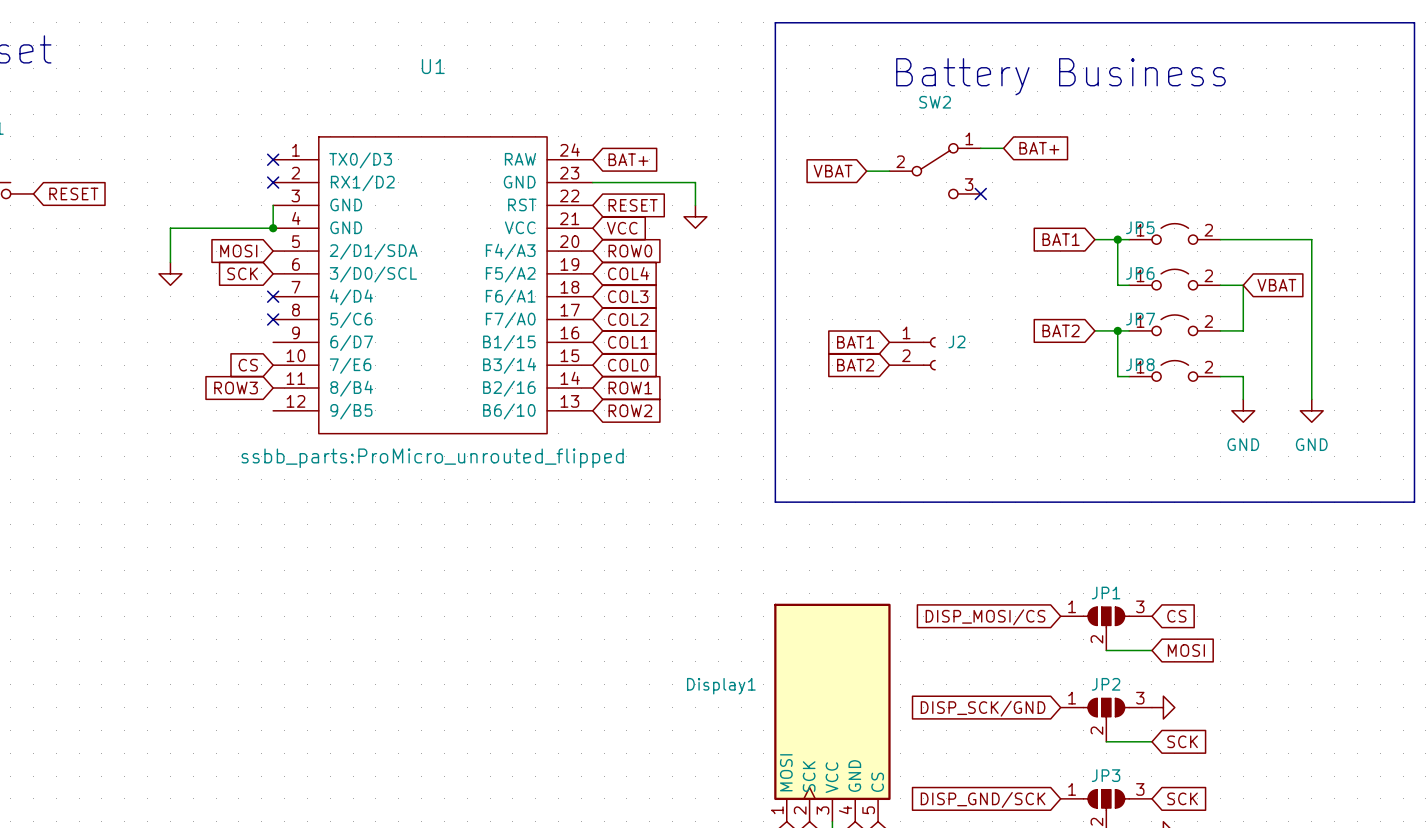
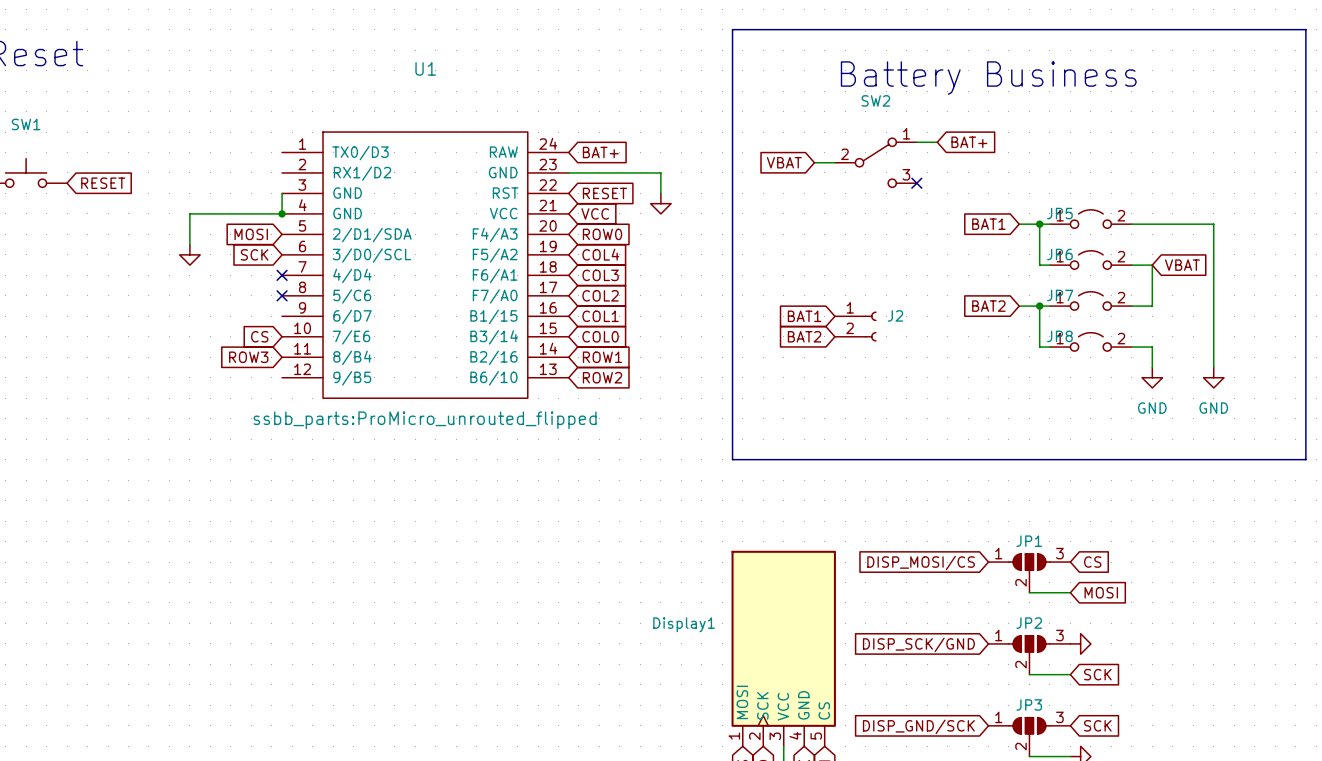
no-connect mark: (273, 159) -> none
no-connect mark: (273, 182) -> none

